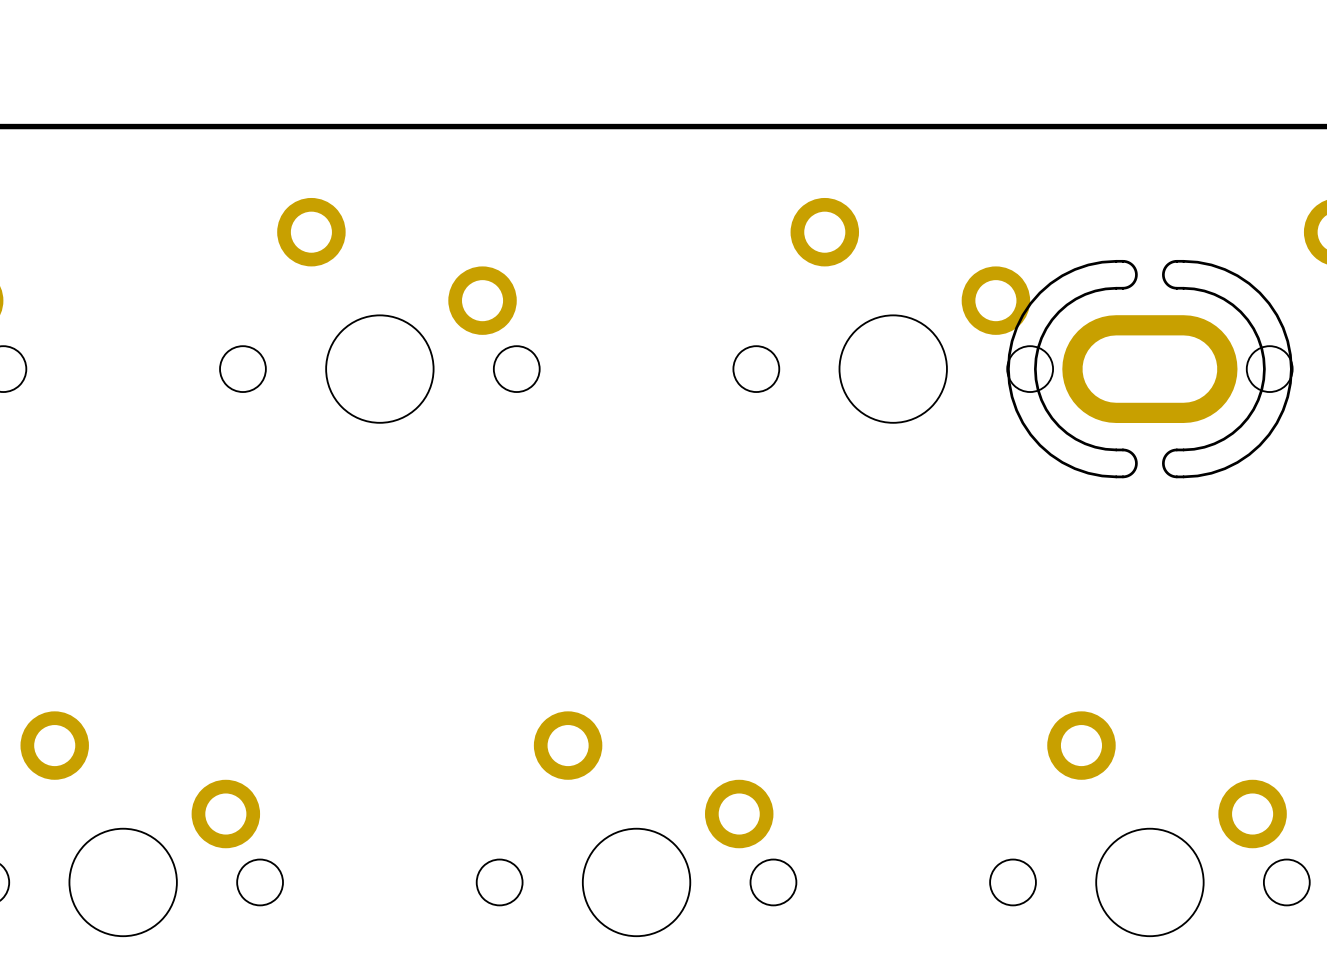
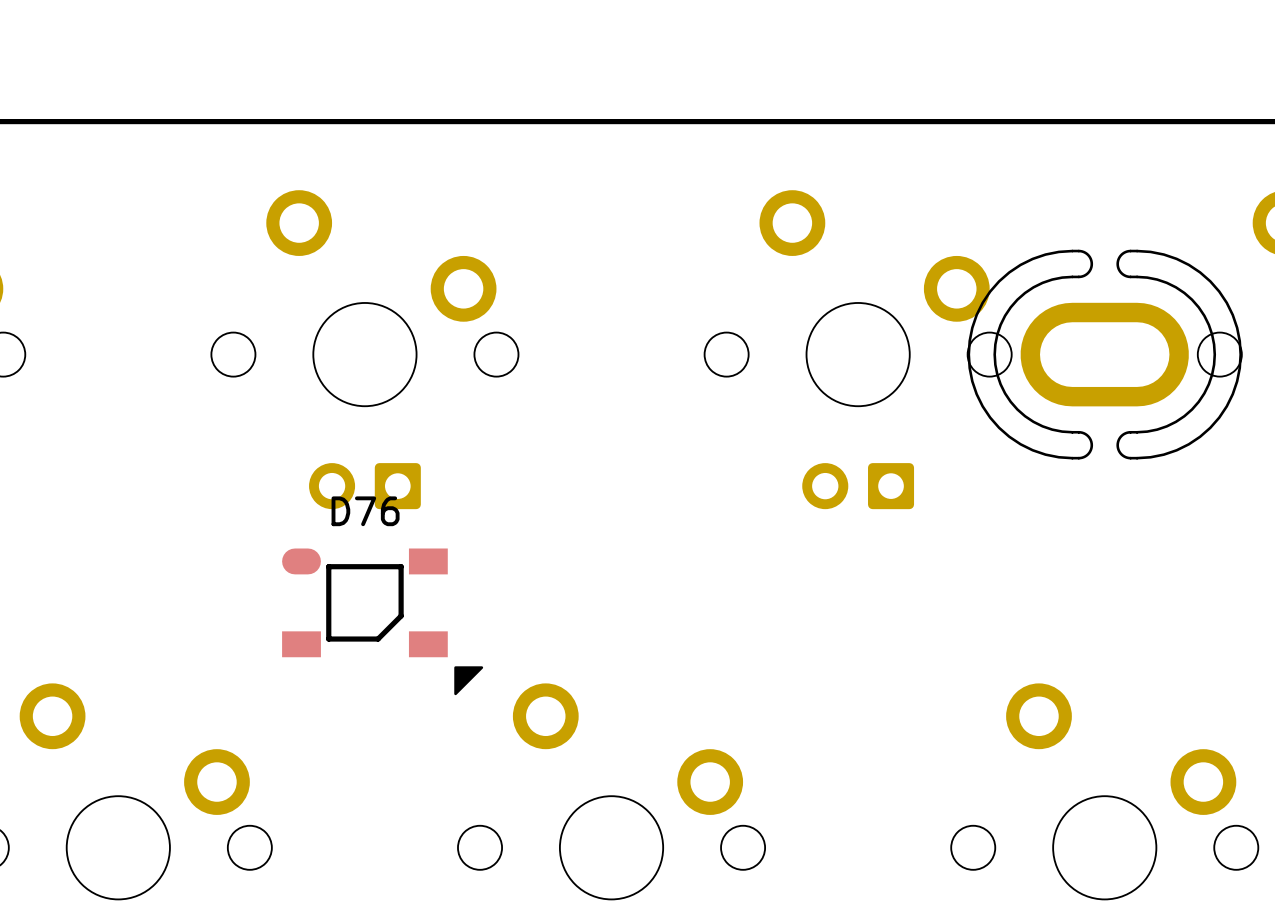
part: none -> (364, 486)
part: none -> (858, 486)
D76: none -> (382, 621)

